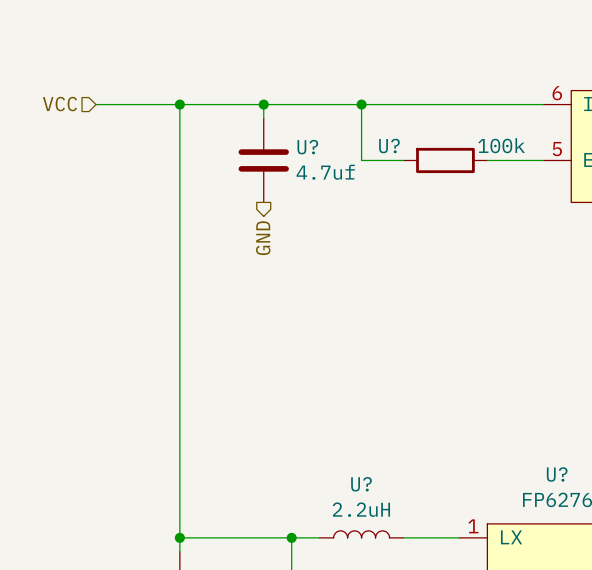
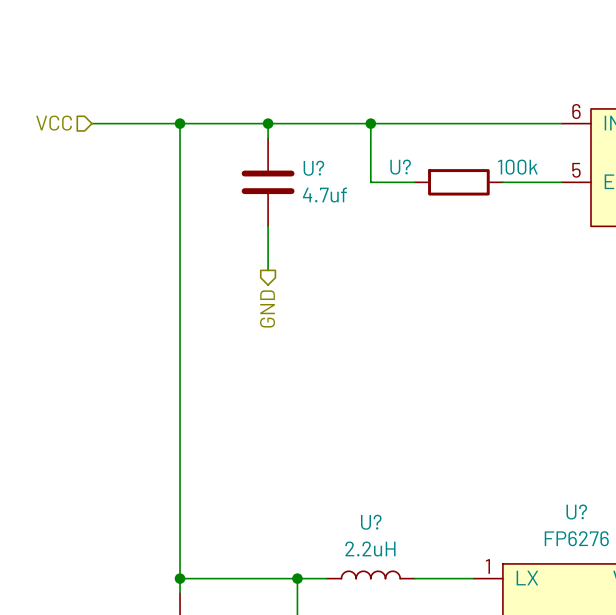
wire: none -> (268, 226) (268, 270)
hierarchical label position: GND (263, 238) -> GND (267, 308)

